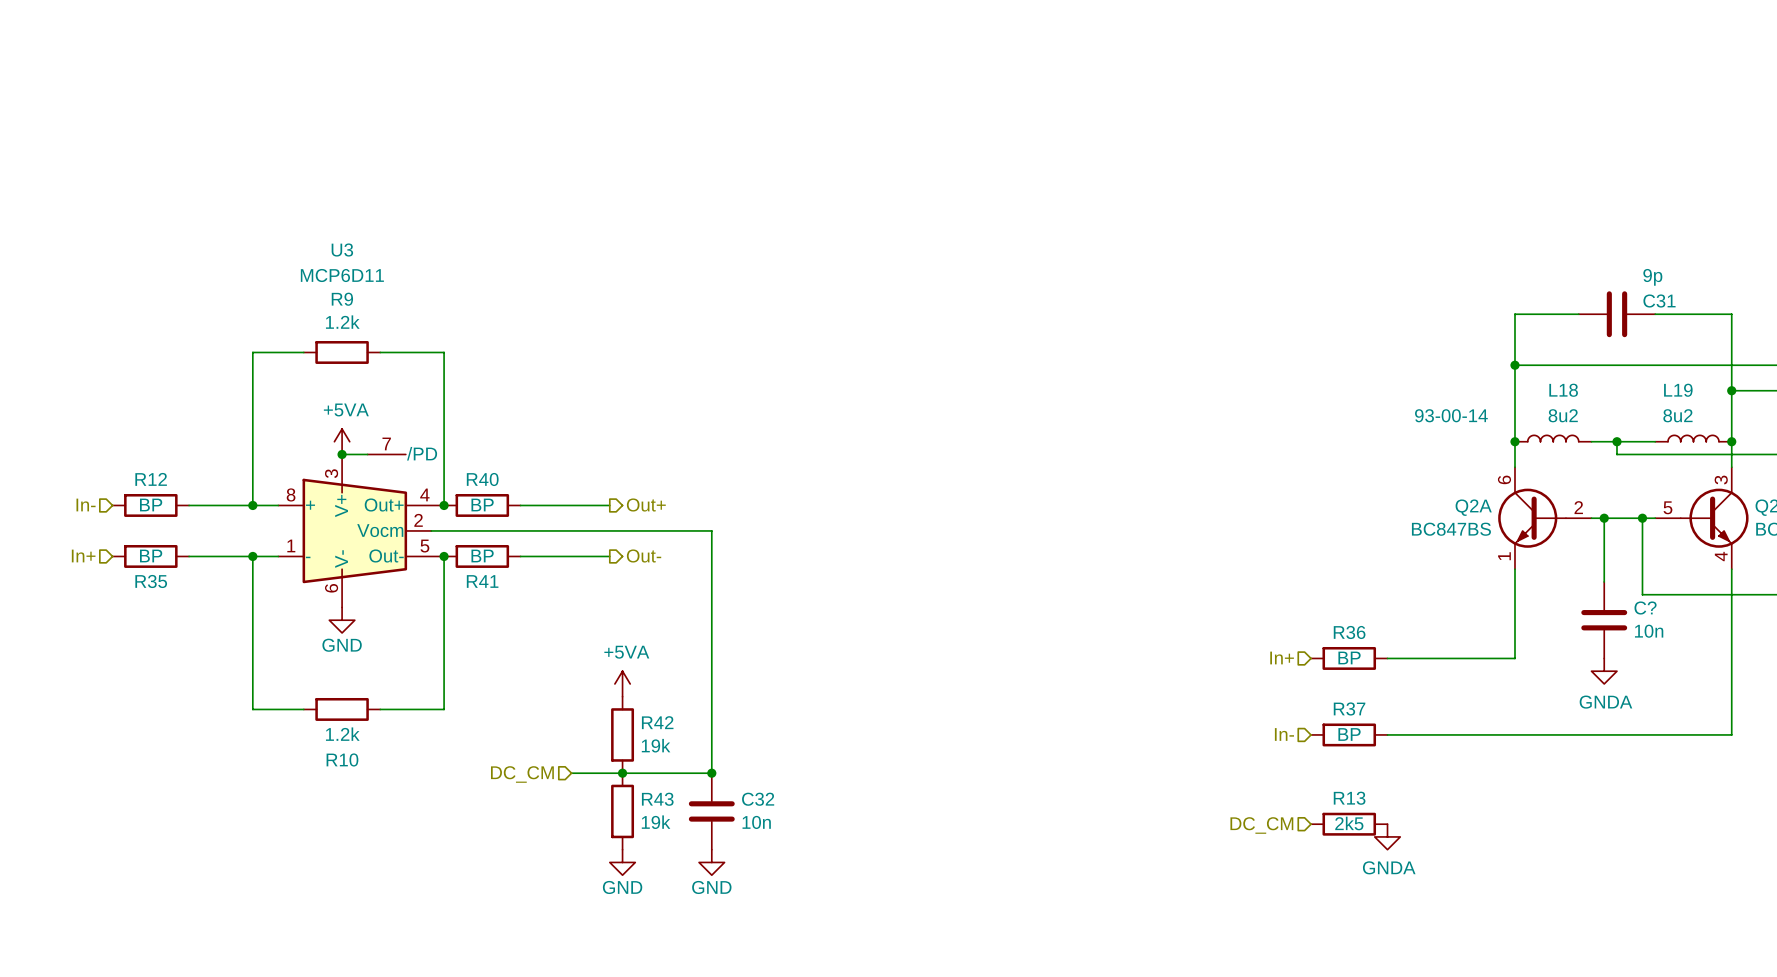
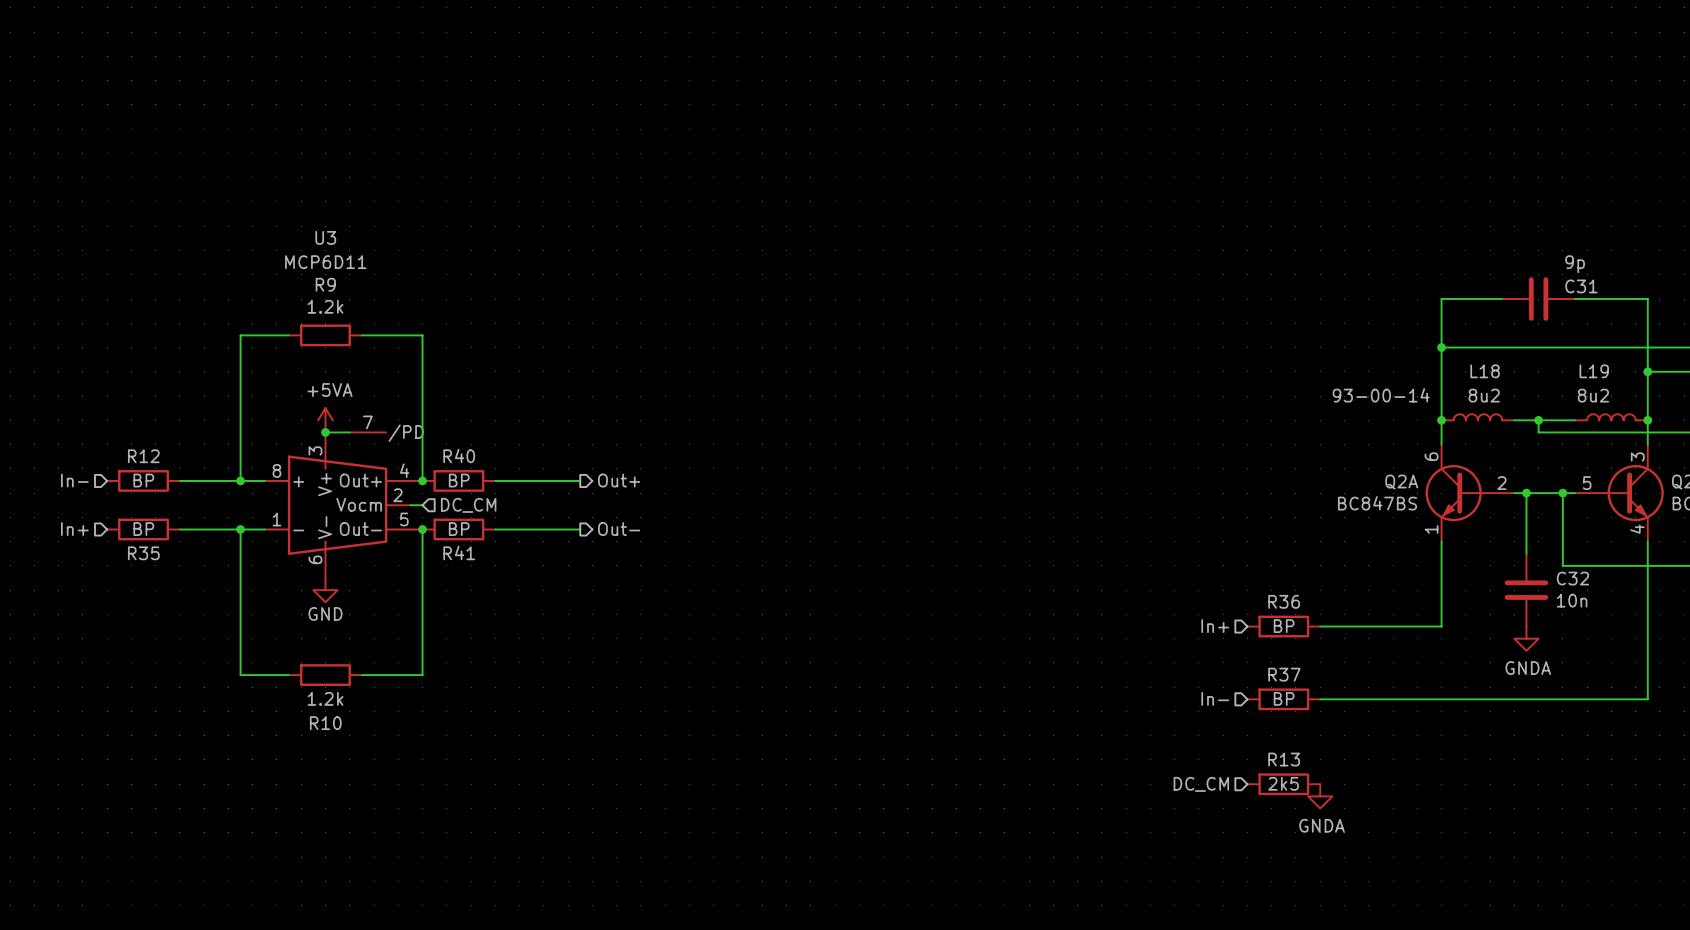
wire: (444, 530) (711, 530) (711, 773) (571, 773) -> none
hierarchical label: none -> DC_CM (468, 505)
C? name: C? (1645, 608) -> C32 (1572, 578)
power symbol: +5VA (622, 683) -> none
R42: 19k (622, 734) -> none
junction: (622, 773) -> none
junction: (711, 773) -> none
hierarchical label: DC_CM (522, 774) -> none
R43: 19k (622, 811) -> none
C32: 10n (711, 811) -> none
power symbol: GND (622, 862) -> none
power symbol: GND (711, 862) -> none

